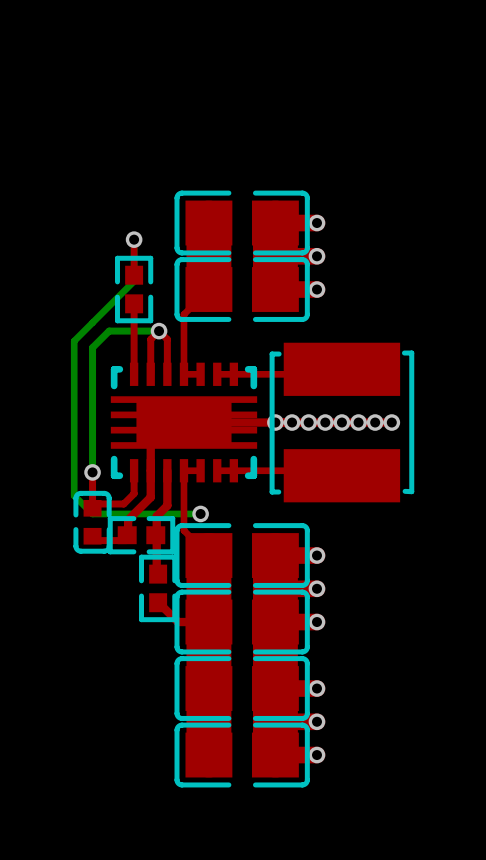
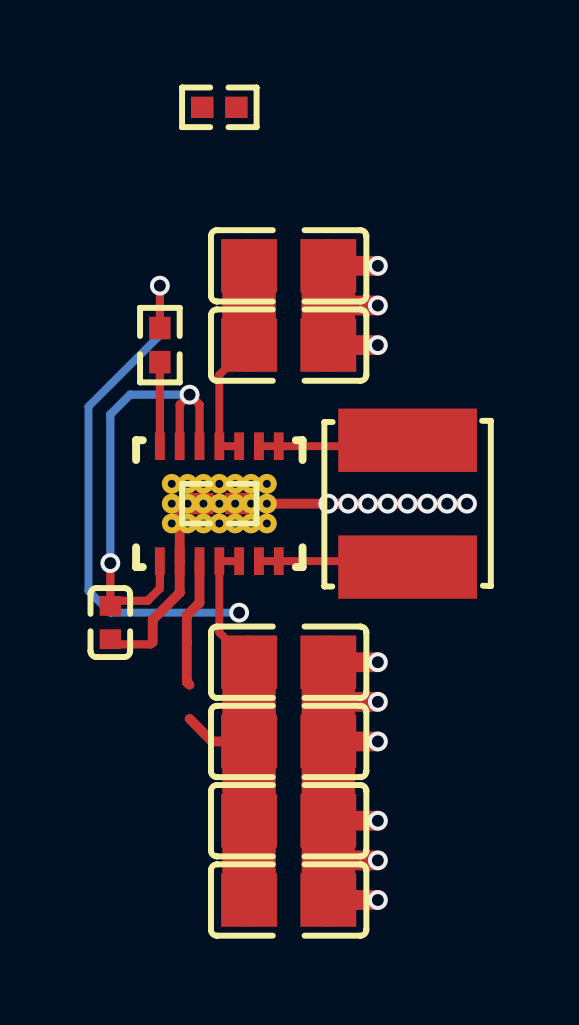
part: none -> (219, 107)
part footprint: [110, 362, 258, 493] -> [132, 432, 307, 587]
part: none -> (219, 503)
part: (141, 535) -> none
part: (158, 588) -> none

